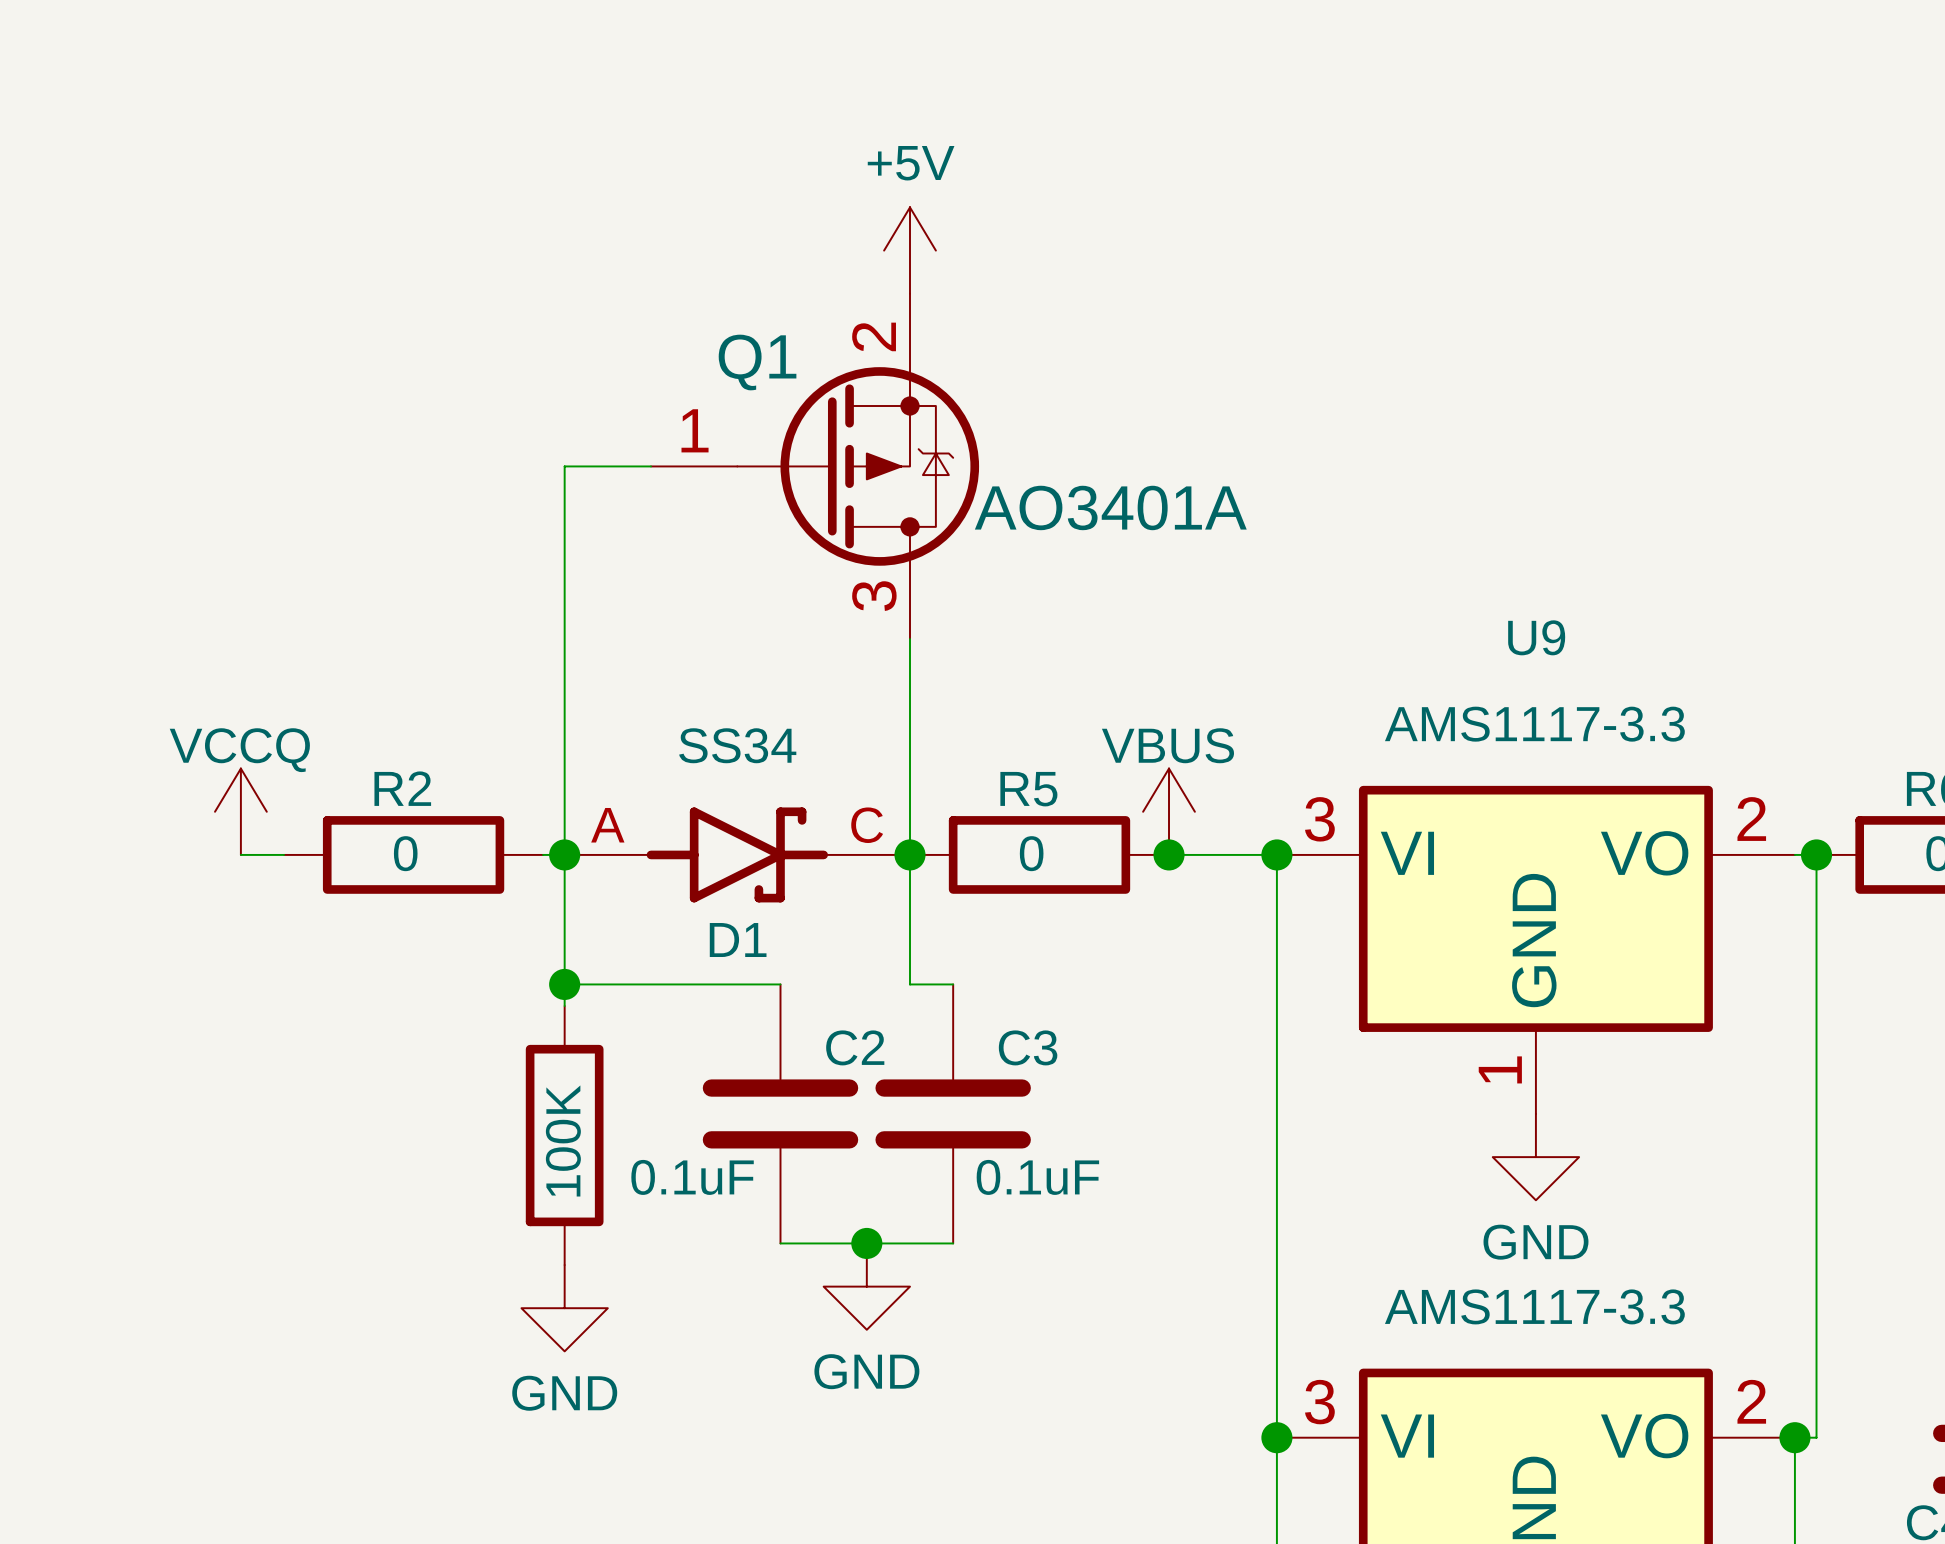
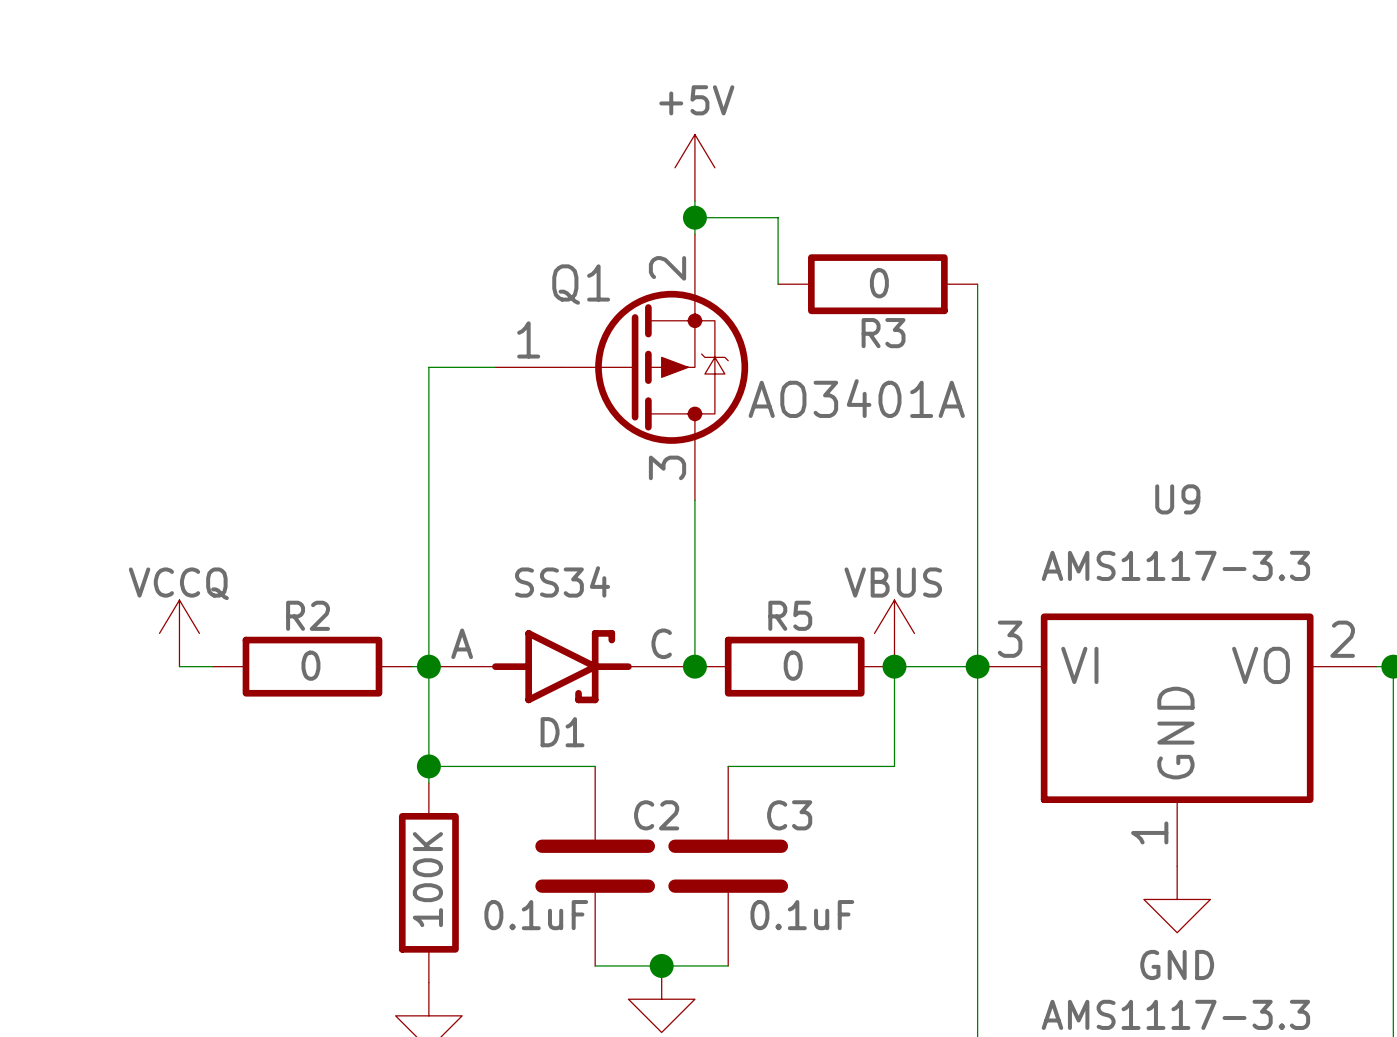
power symbol position: +5V (910, 250) -> +5V (694, 167)
wire: none -> (694, 217) (778, 217) (778, 284)
junction: none -> (694, 217)
R3: none -> 0 (877, 284)
wire: none -> (977, 284) (977, 666)
wire: (910, 854) (910, 984) (953, 984) -> (894, 666) (894, 766) (728, 766)

